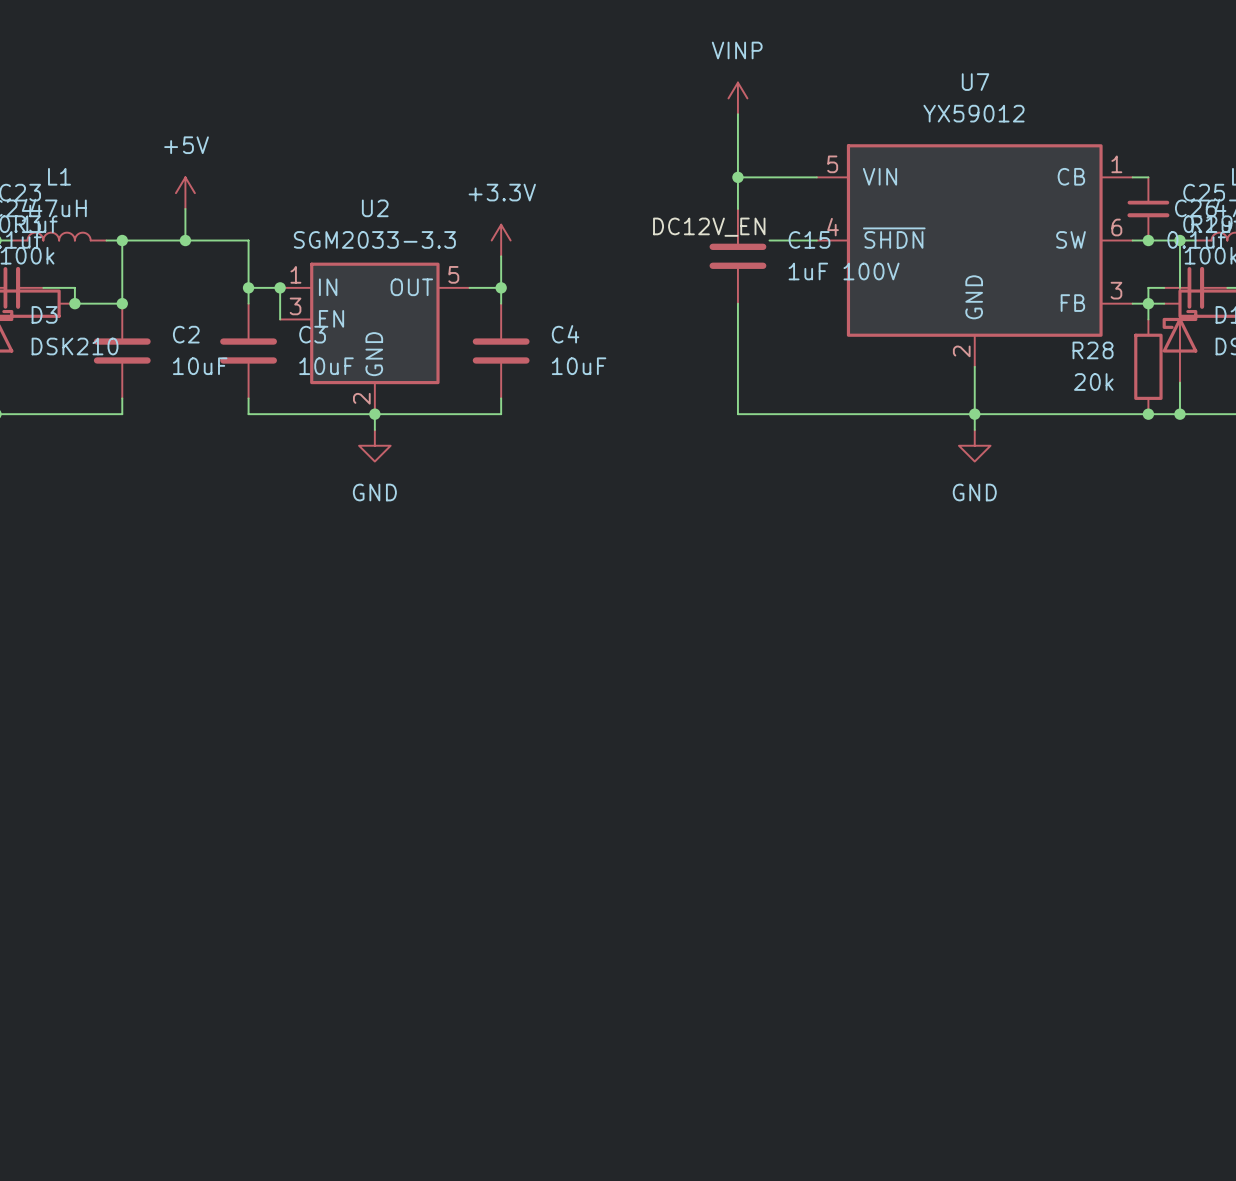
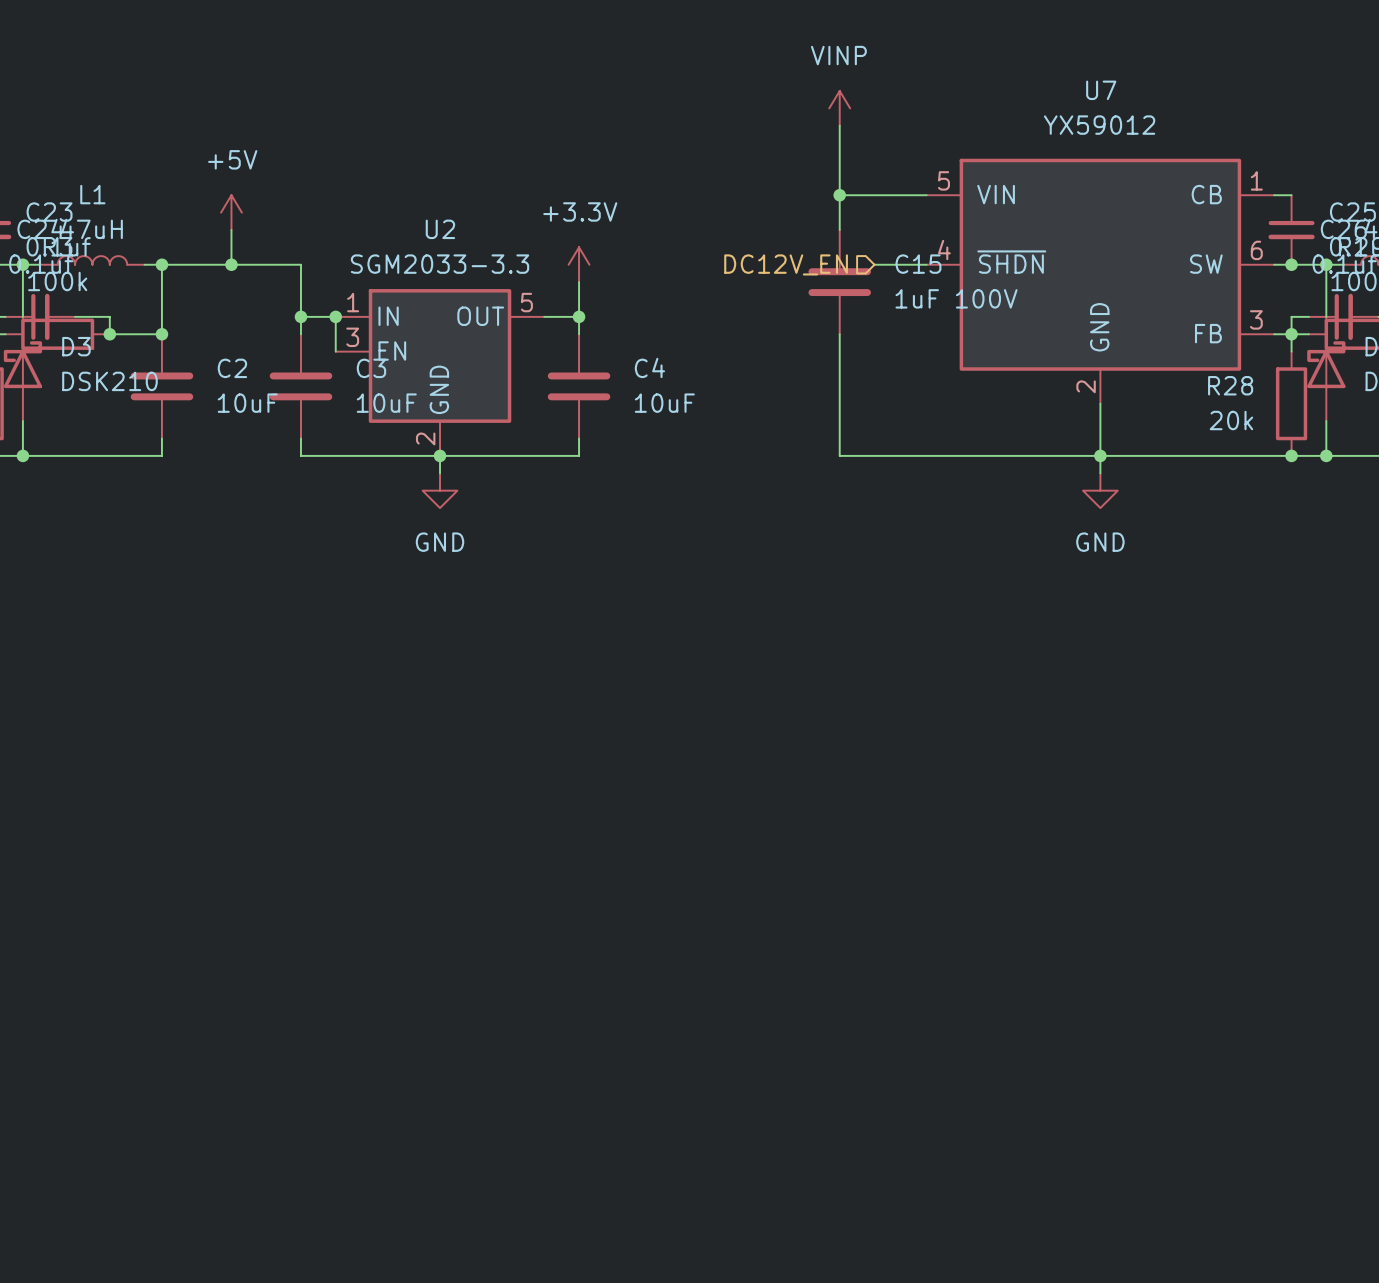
label: DC12V_EN (709, 227) -> none
hierarchical label: none -> DC12V_EN (786, 264)

